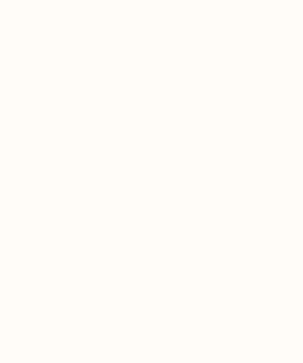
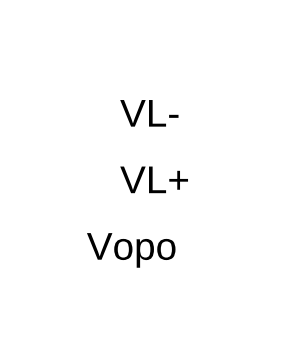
label: none -> VL- (149, 113)
label: none -> VL+ (154, 179)
label: none -> Vopo (131, 250)

